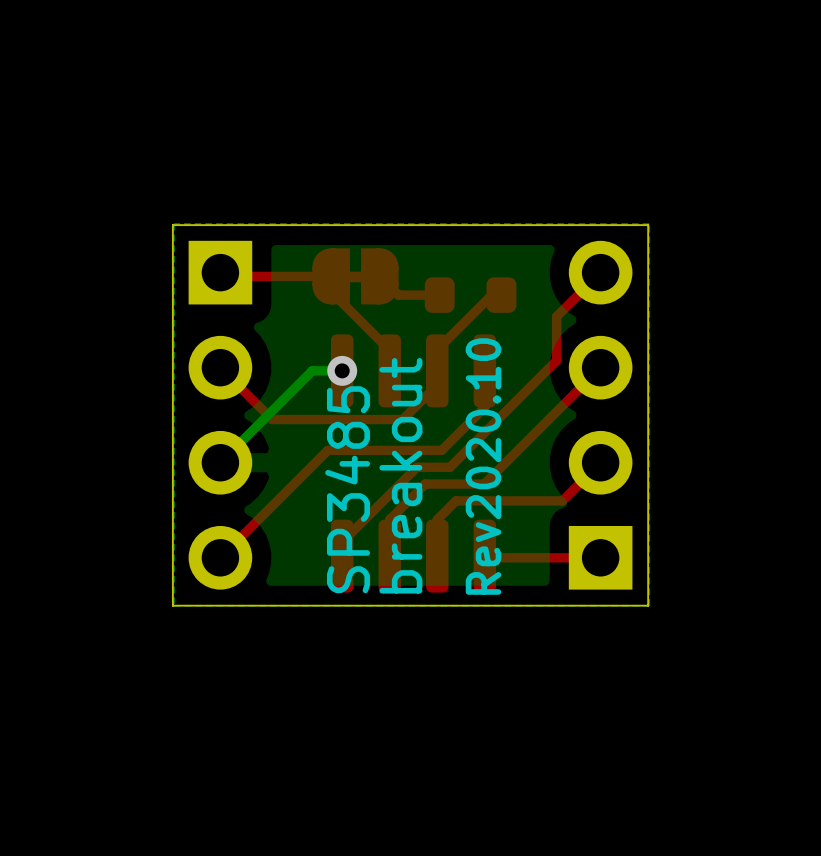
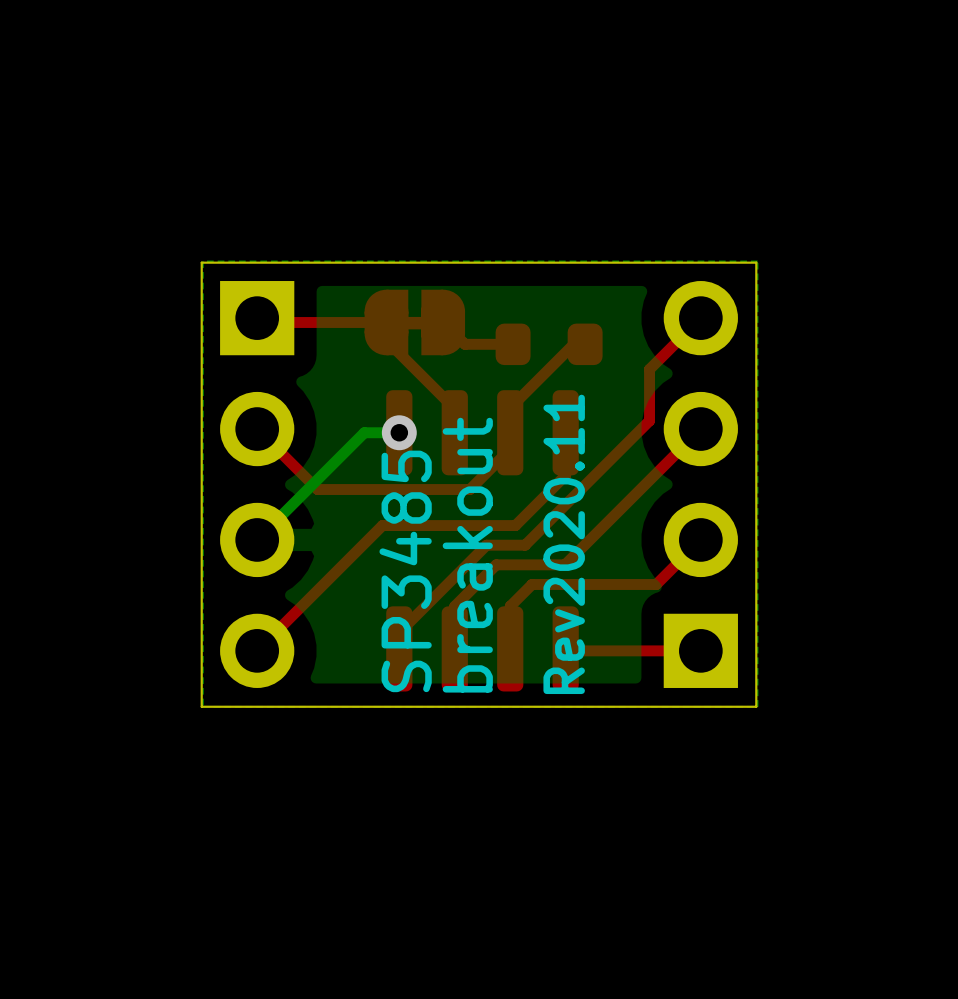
text: Rev2020.10 (483, 466) -> Rev2020.11 (564, 544)

